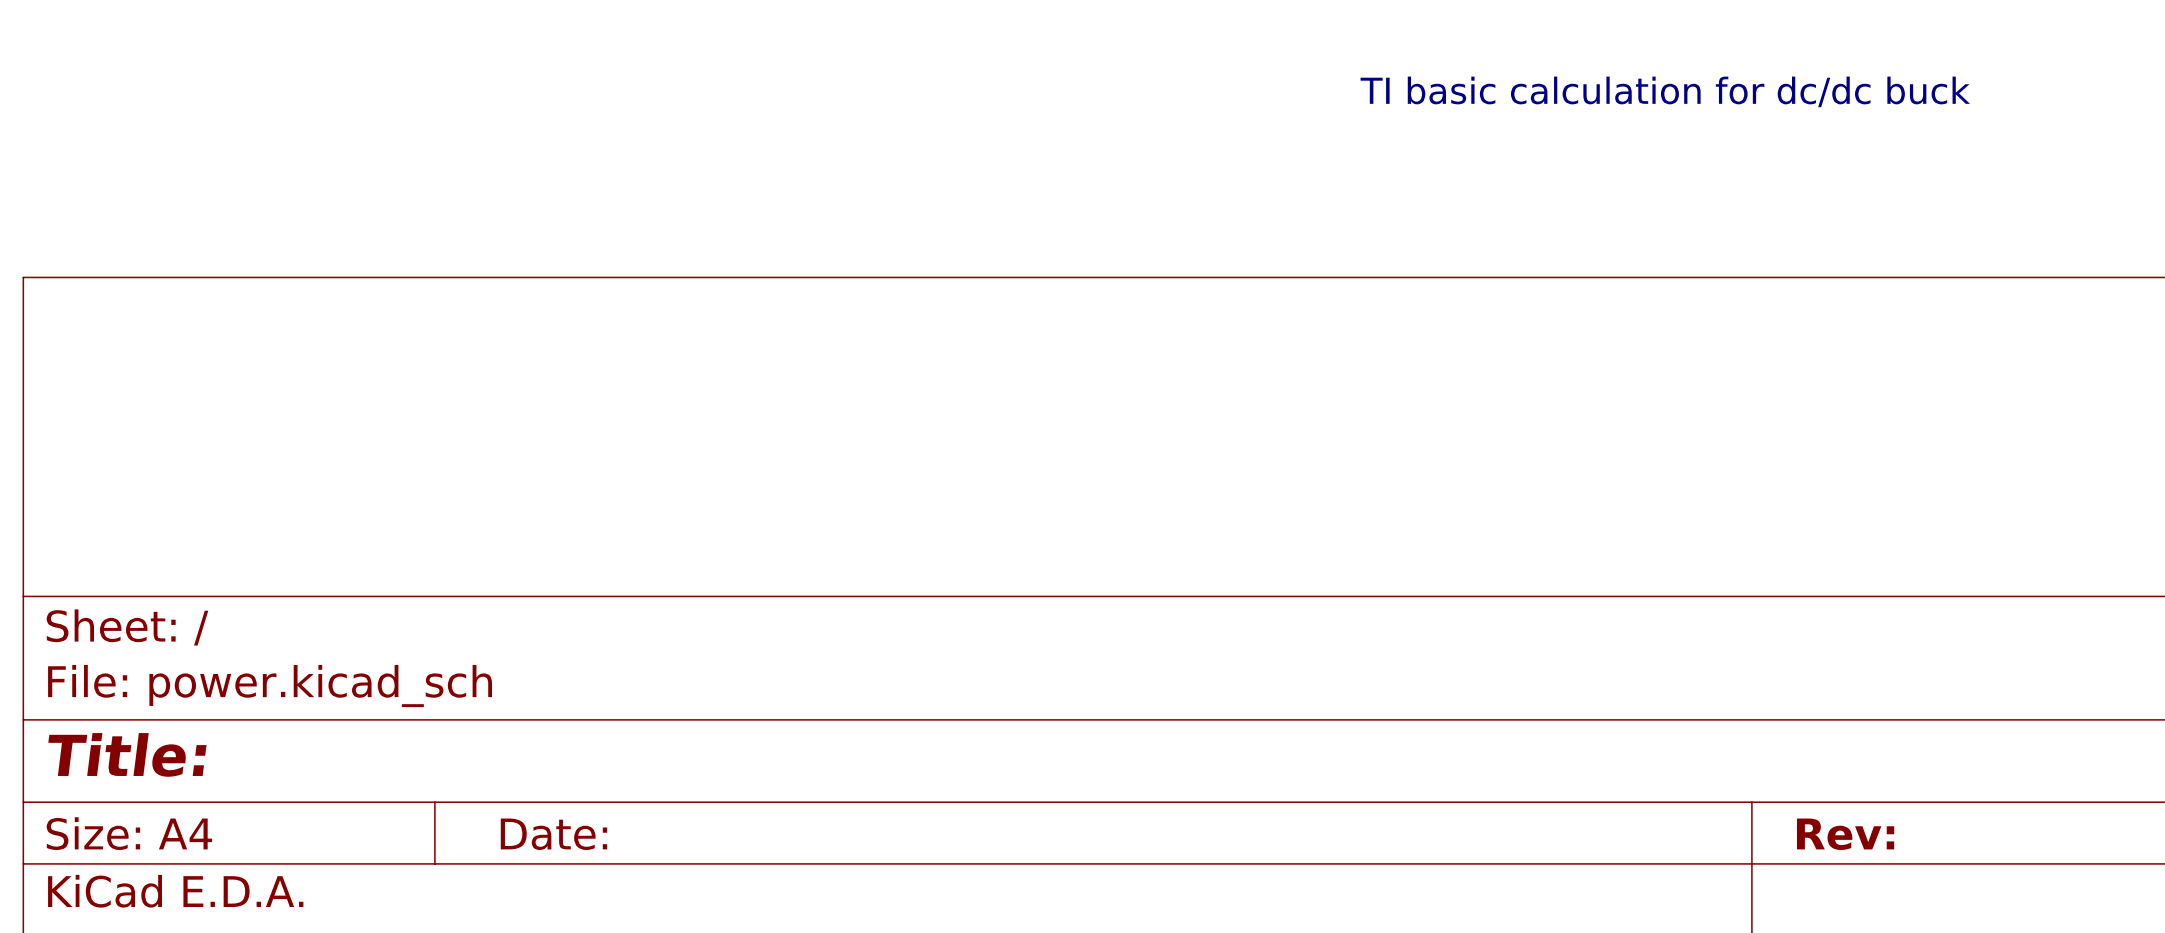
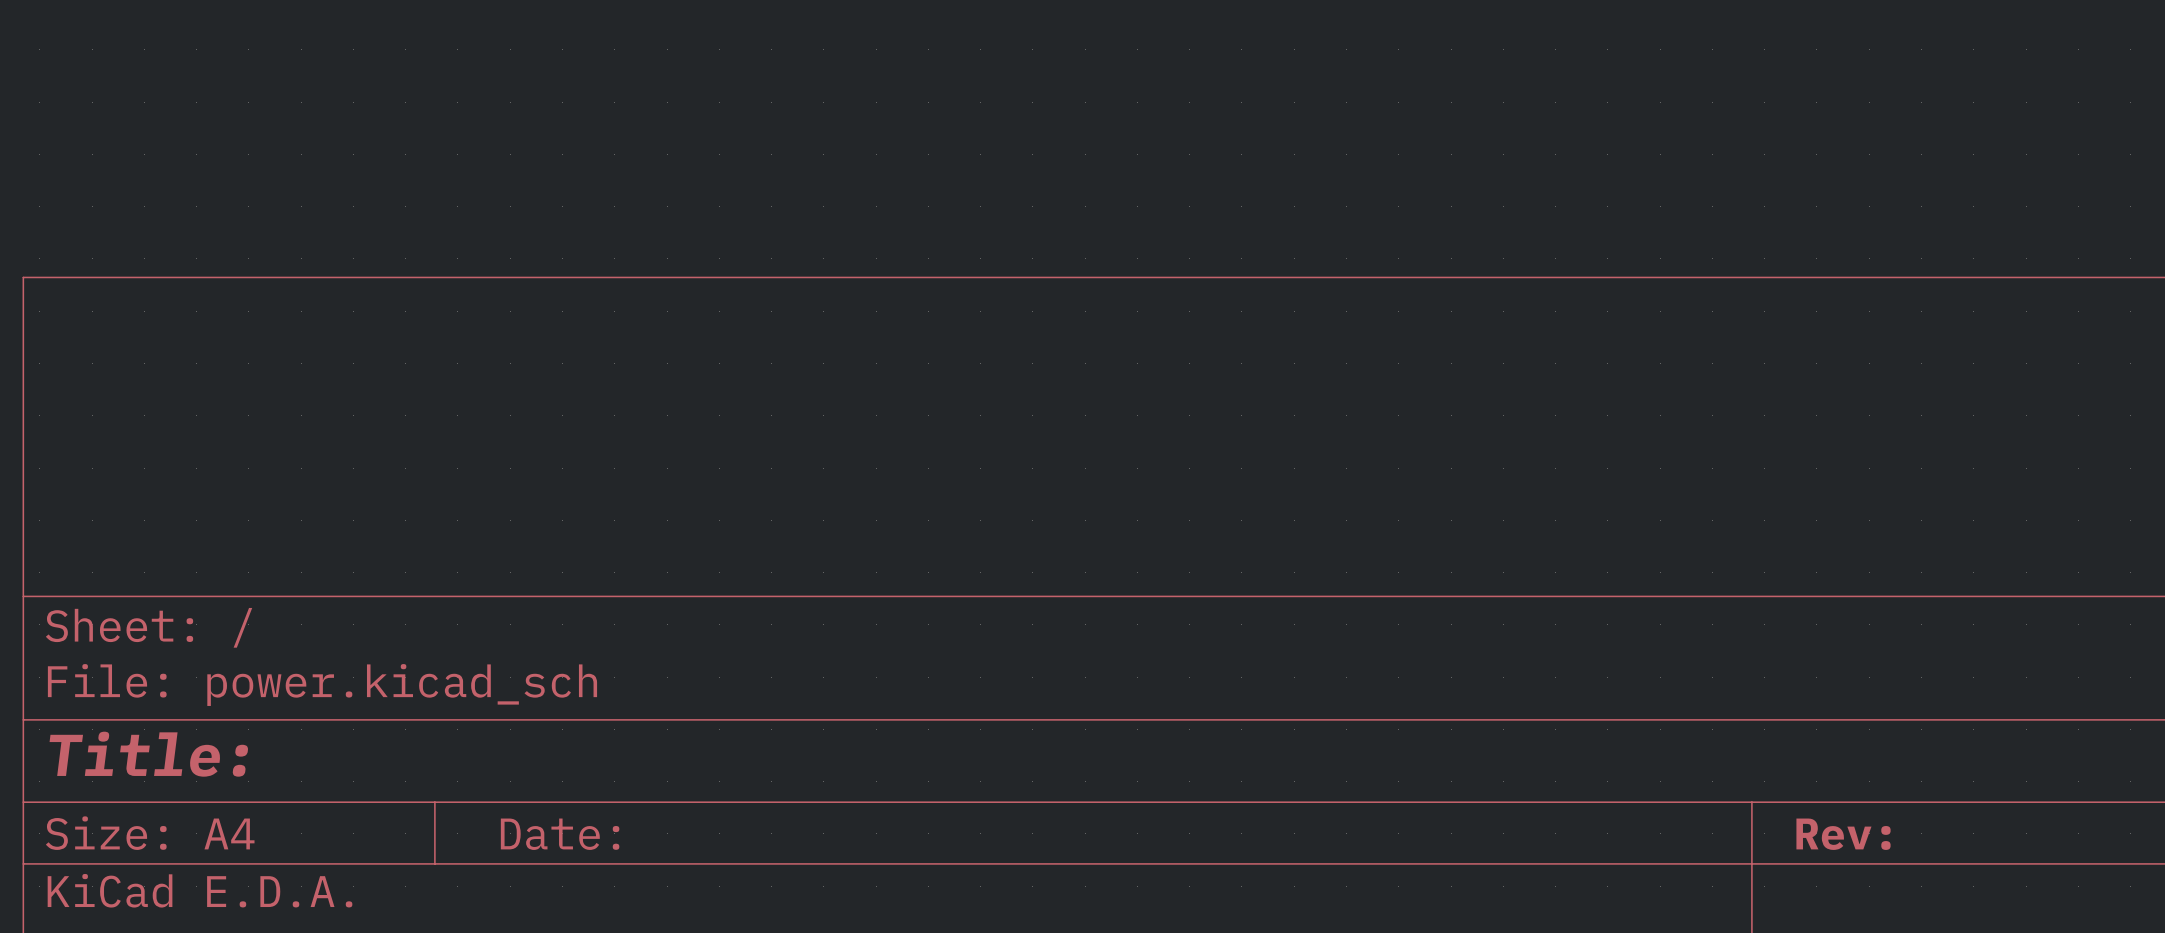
text: TI basic calculation for dc/dc buck (1665, 91) -> none

